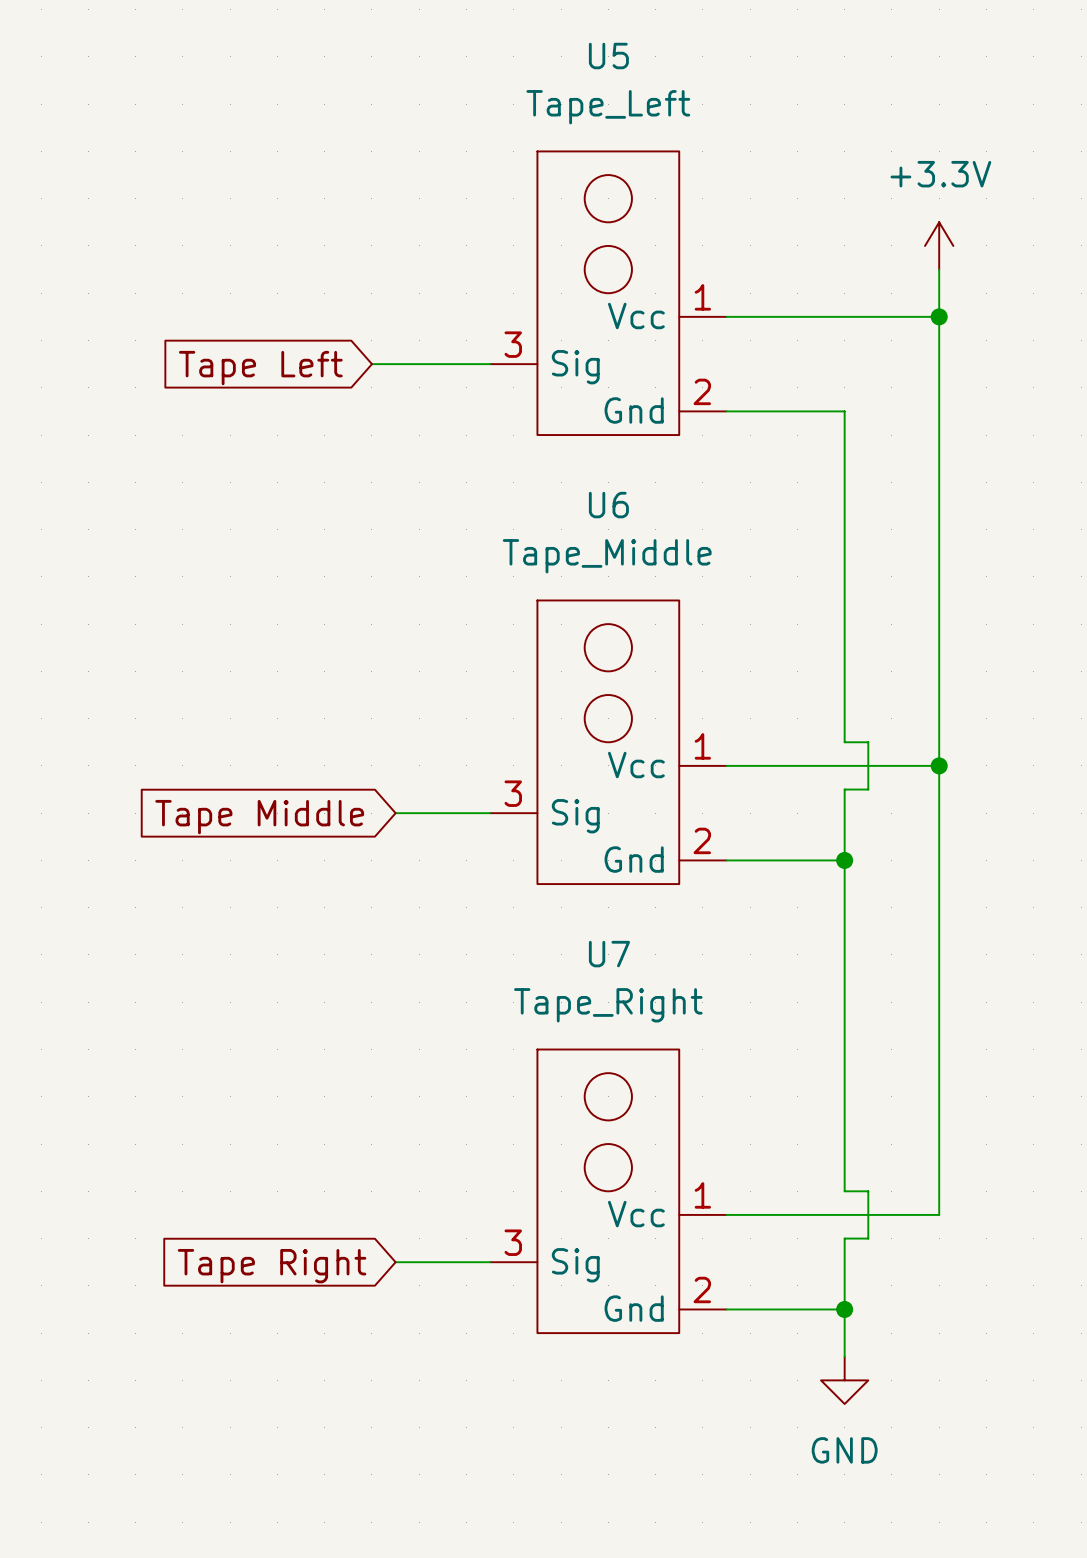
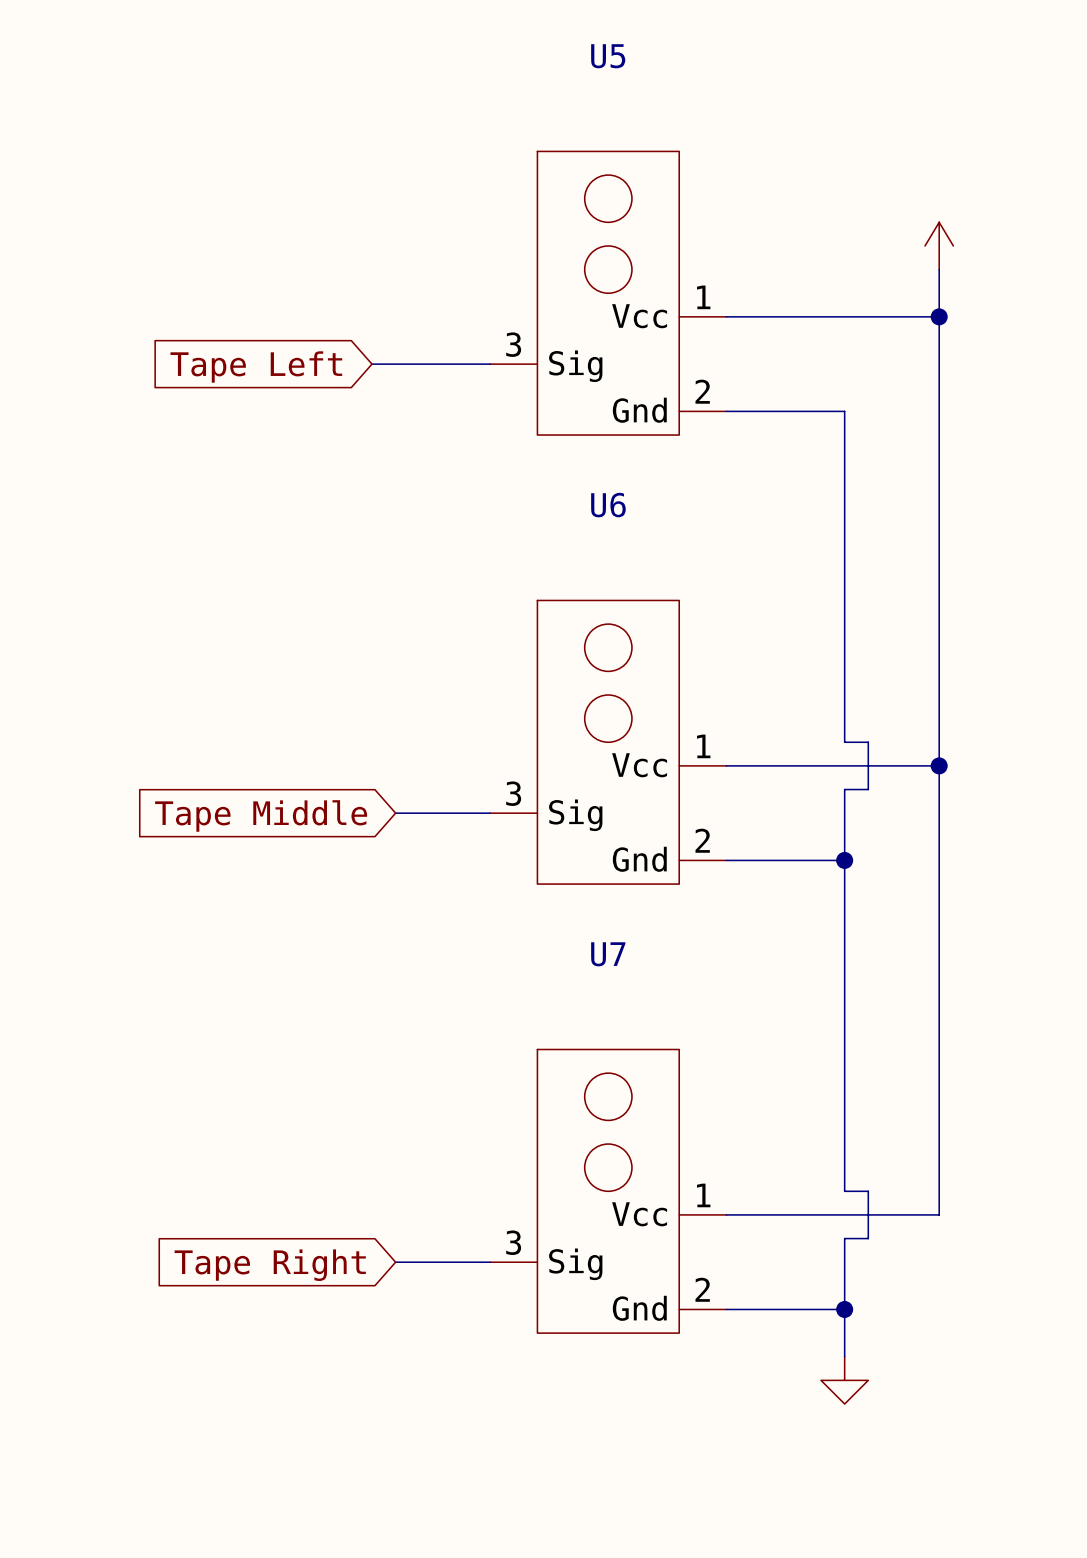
U5 value: Tape_Left (608, 107) -> none
power symbol text: +3.3V (940, 174) -> none
U6 value: Tape_Middle (607, 556) -> none
U7 value: Tape_Right (608, 1005) -> none
power symbol text: GND (844, 1450) -> none

